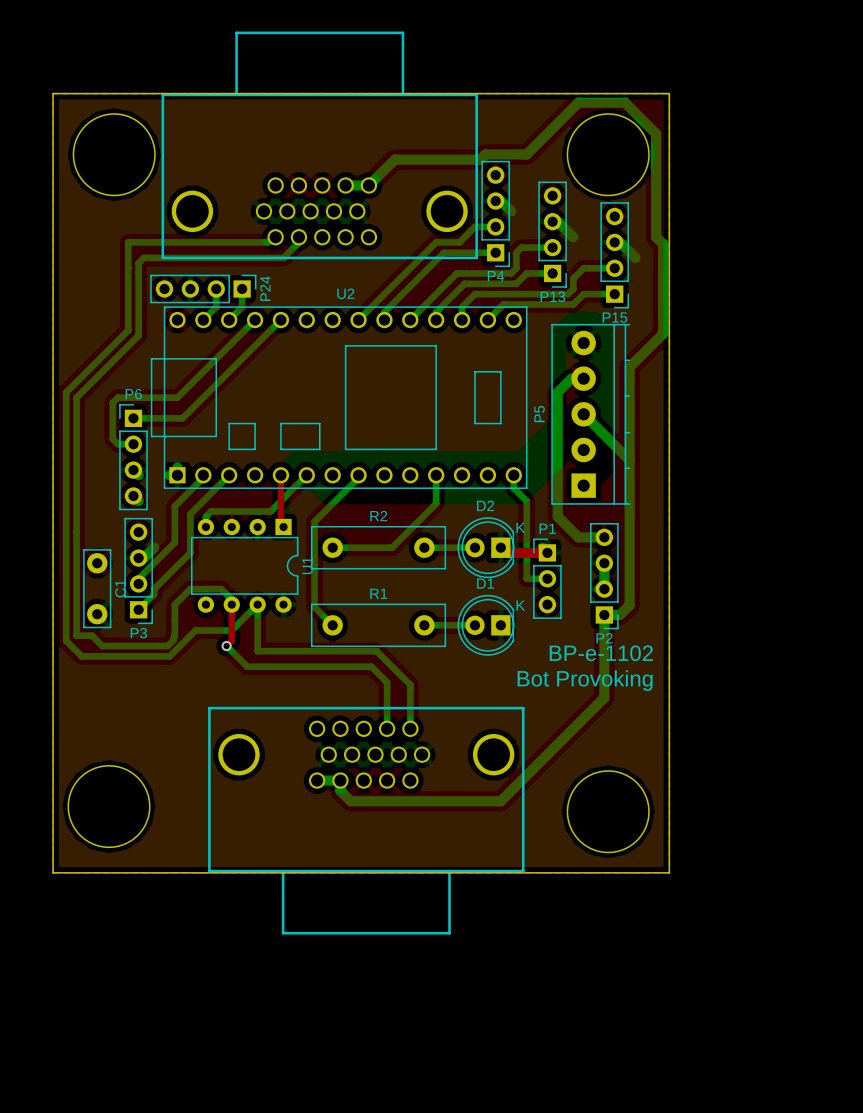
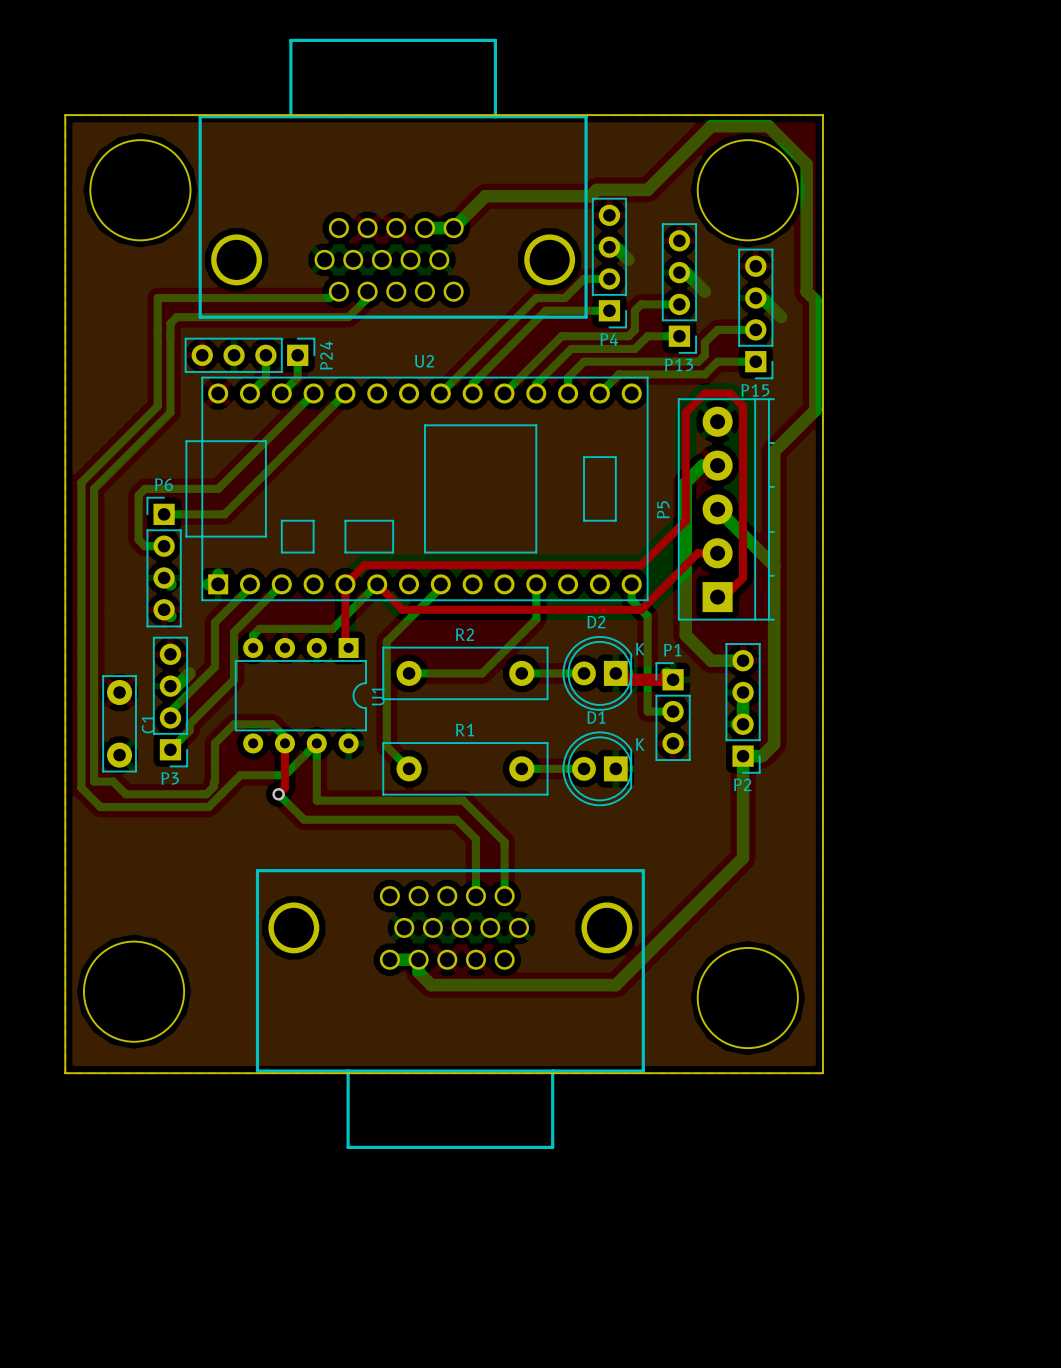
top track: none -> (717, 553) (697, 553) (641, 609) (402, 609) (377, 584)
top track: none -> (345, 584) (364, 565) (641, 565) (685, 520) (685, 412) (704, 393) (730, 393) (743, 406) (743, 577) (723, 597)
text: BP-e-1102 (601, 653) -> none
text: Bot Provoking (585, 680) -> none

